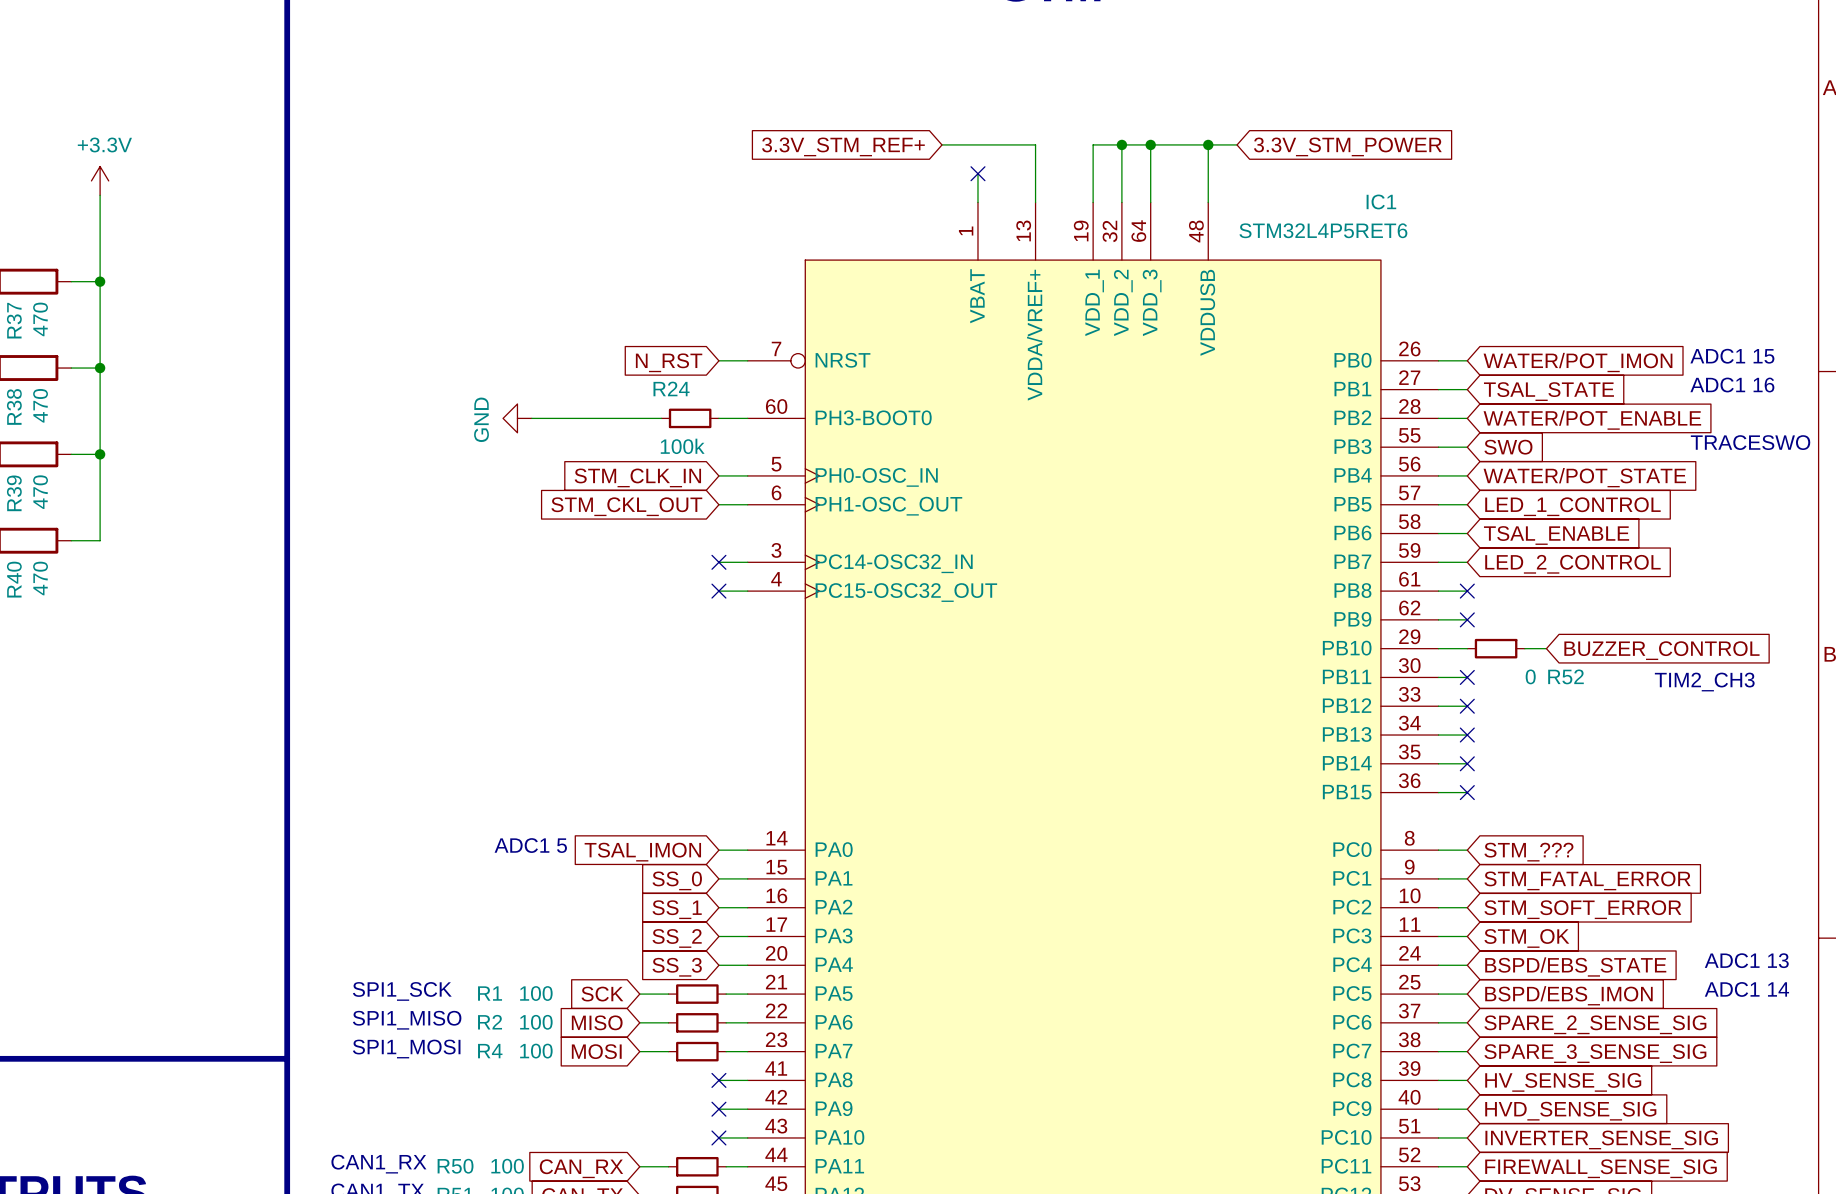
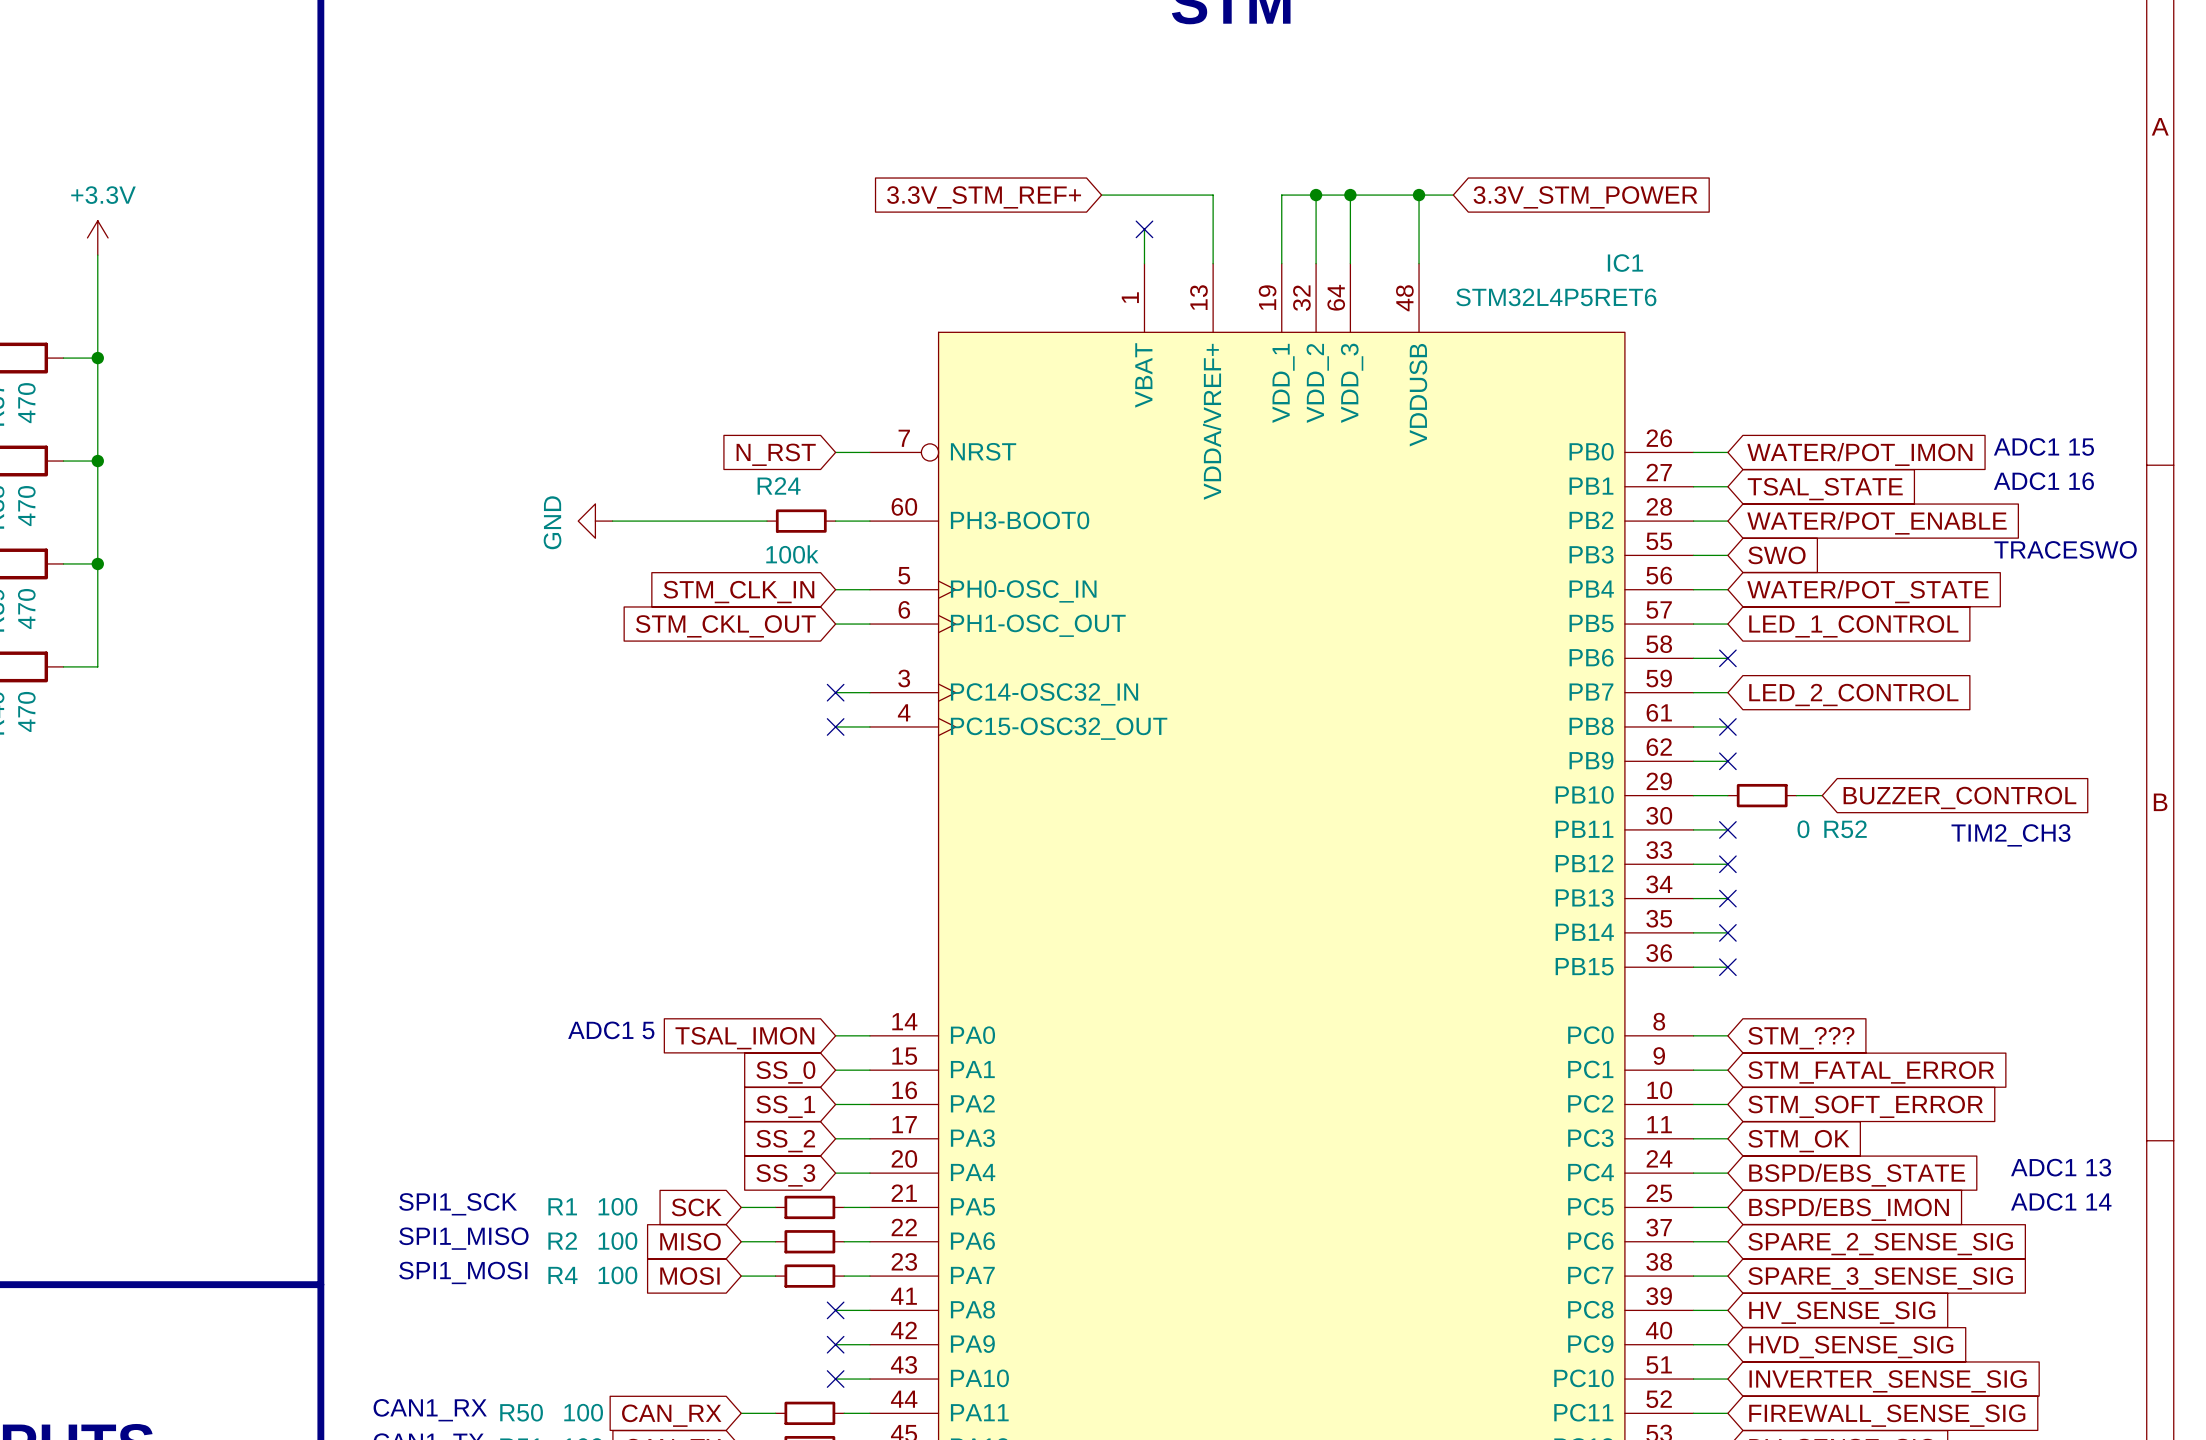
no-connect mark: none -> (1727, 658)
global label: TSAL_ENABLE (1556, 535) -> none

